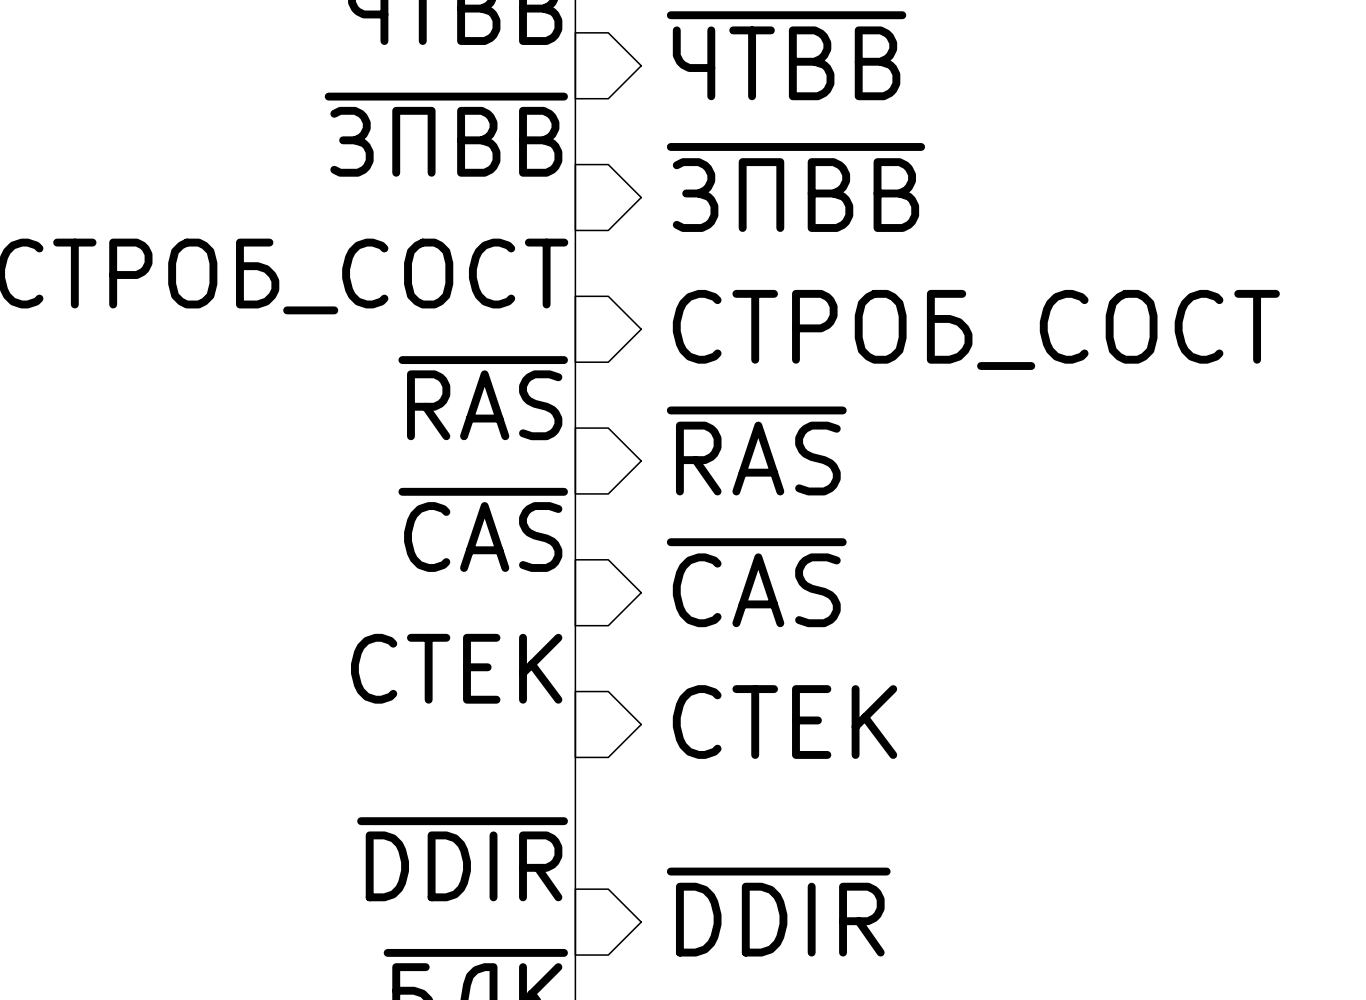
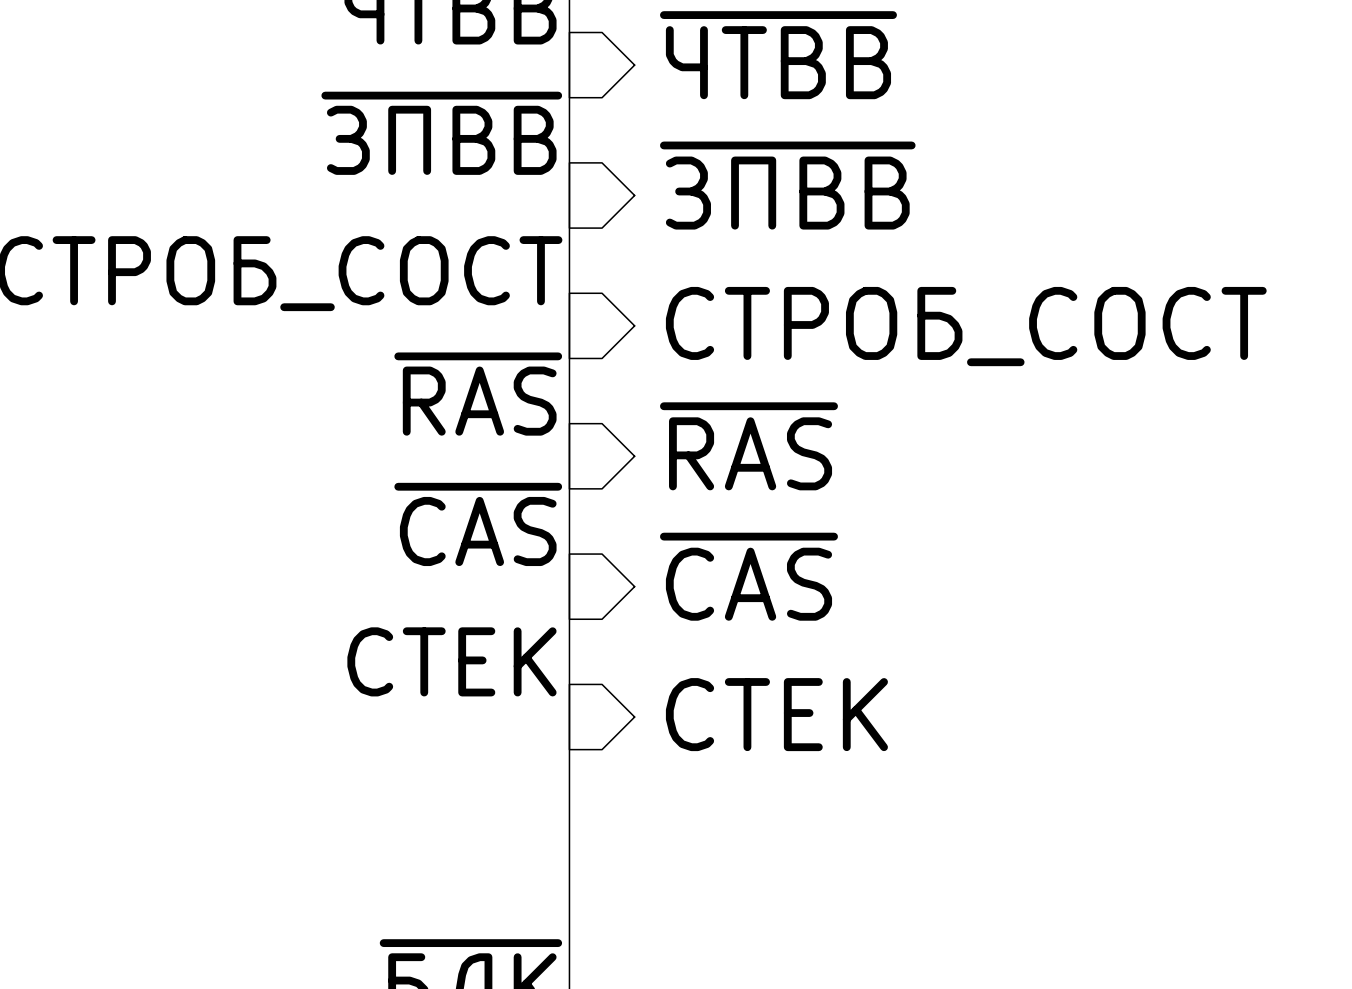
label: ~{DDIR} (462, 859) -> none
sheet pin: ~{DDIR} (778, 912) -> none

